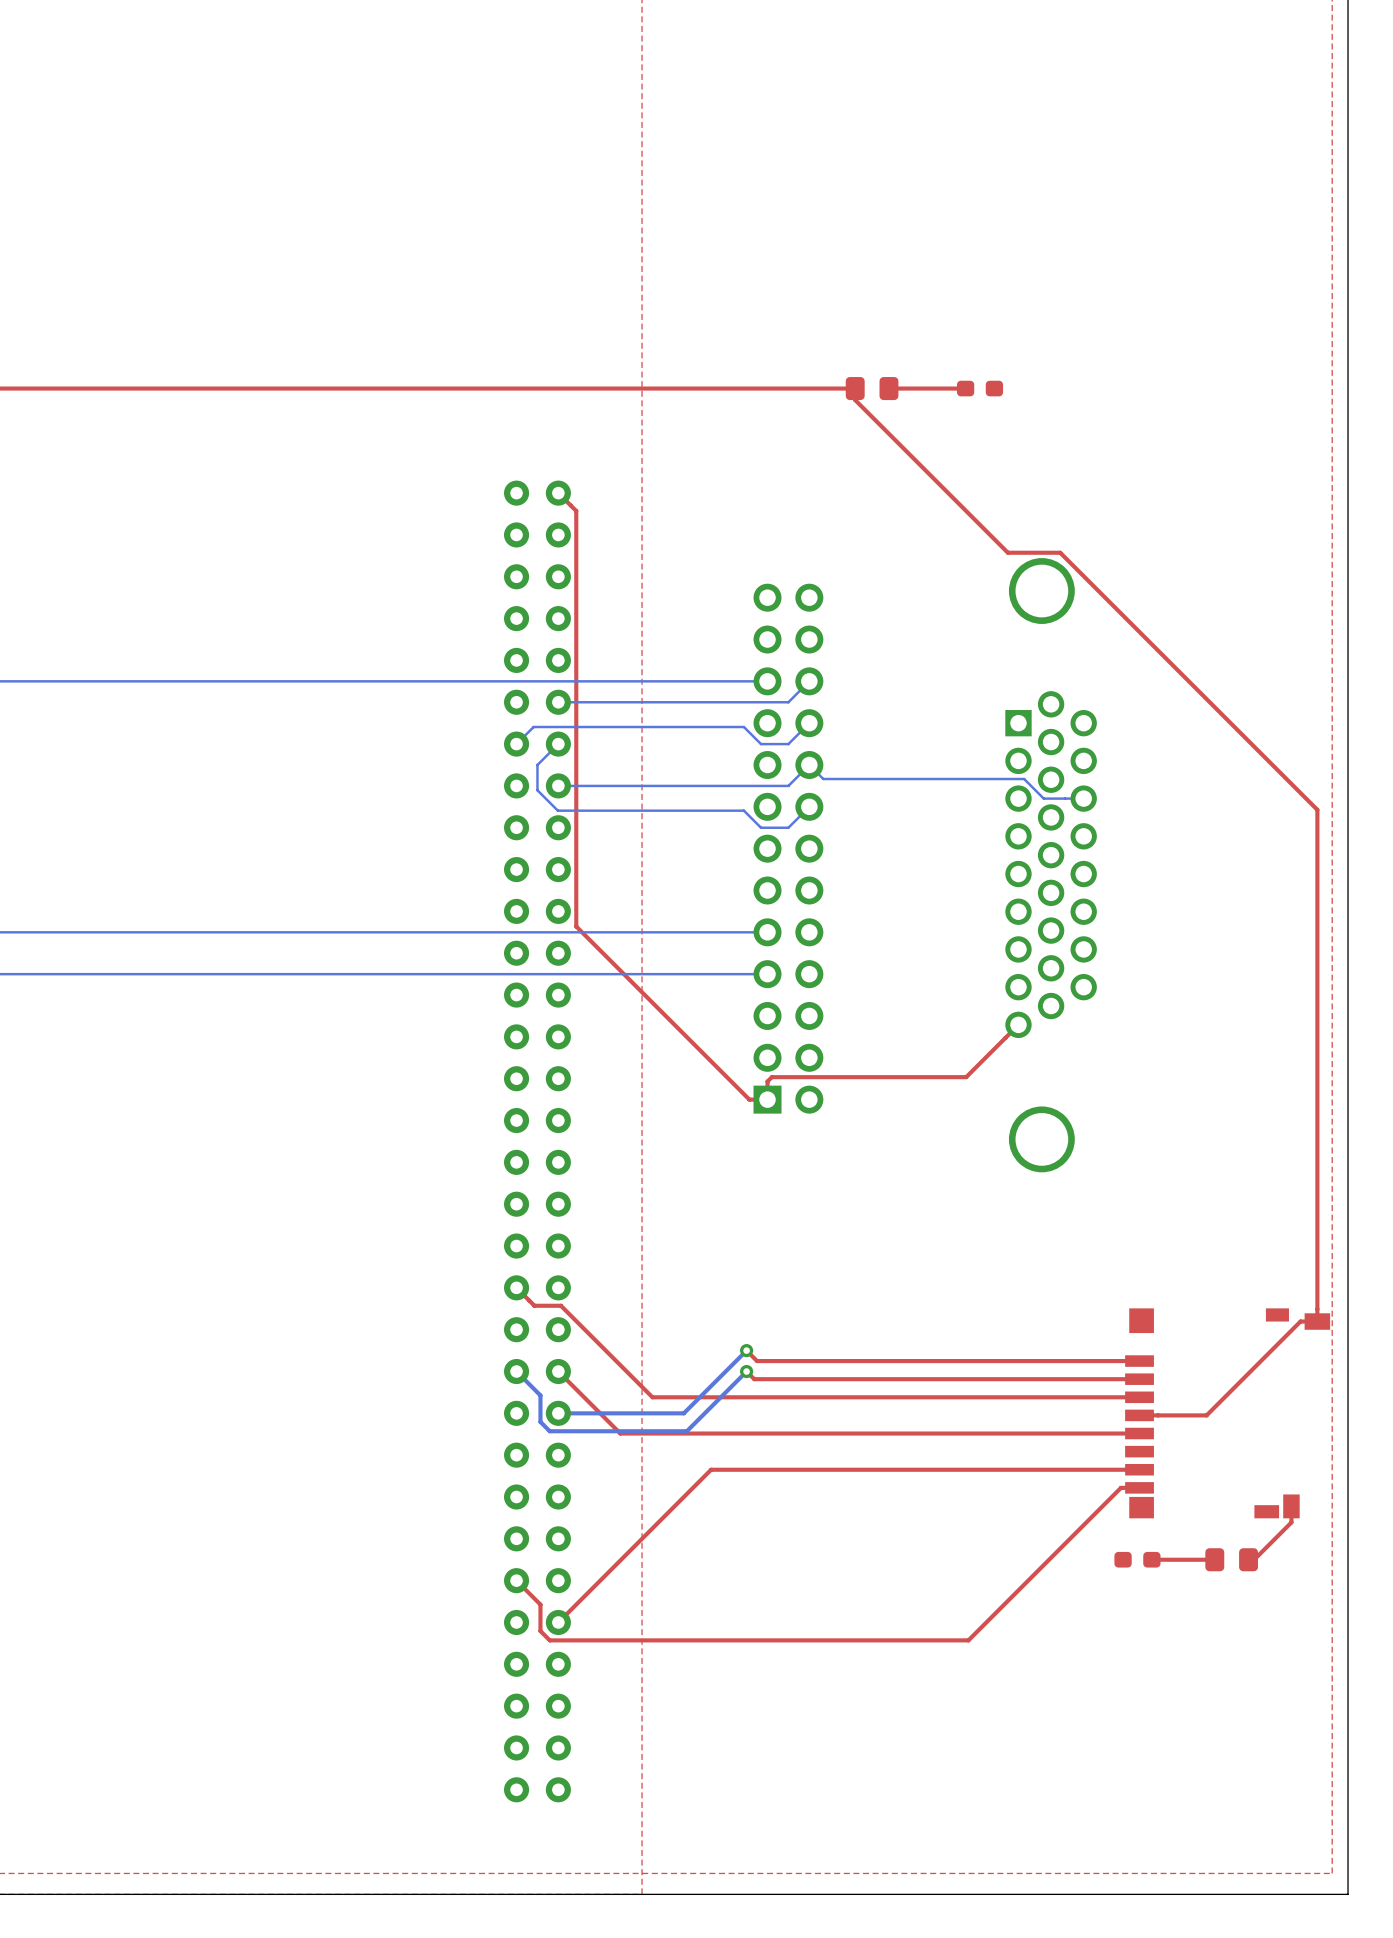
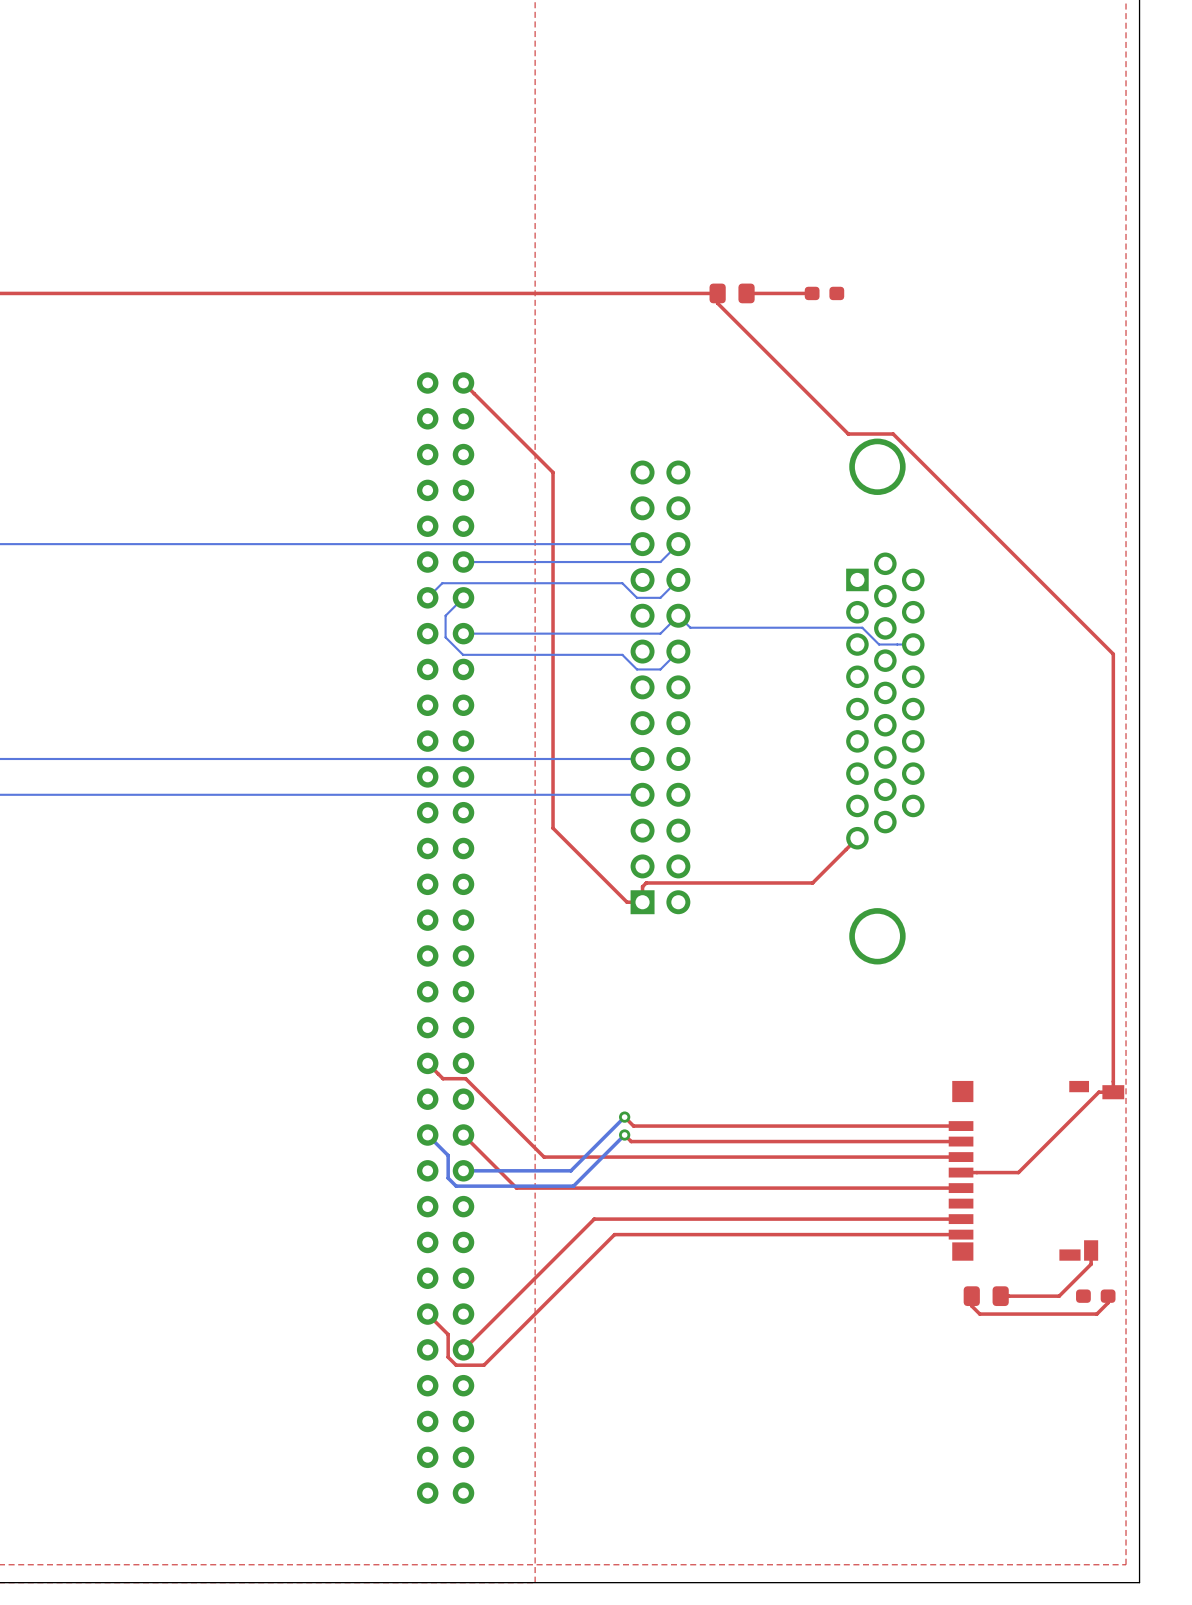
top track: (576, 511) (576, 926) (662, 1013) -> (478, 398) (553, 472) (553, 828)
top track: (1121, 1487) (968, 1640) (582, 1640) -> (945, 1234) (614, 1234) (483, 1365)
part position: (1137, 1559) -> (1095, 1296)
top track: (1185, 1559) (1151, 1559) -> (1108, 1296) (1108, 1302) (1096, 1314) (979, 1314) (971, 1306) (971, 1296)
part position: (1231, 1559) -> (986, 1296)
top track: none -> (1054, 1296) (1025, 1296)

